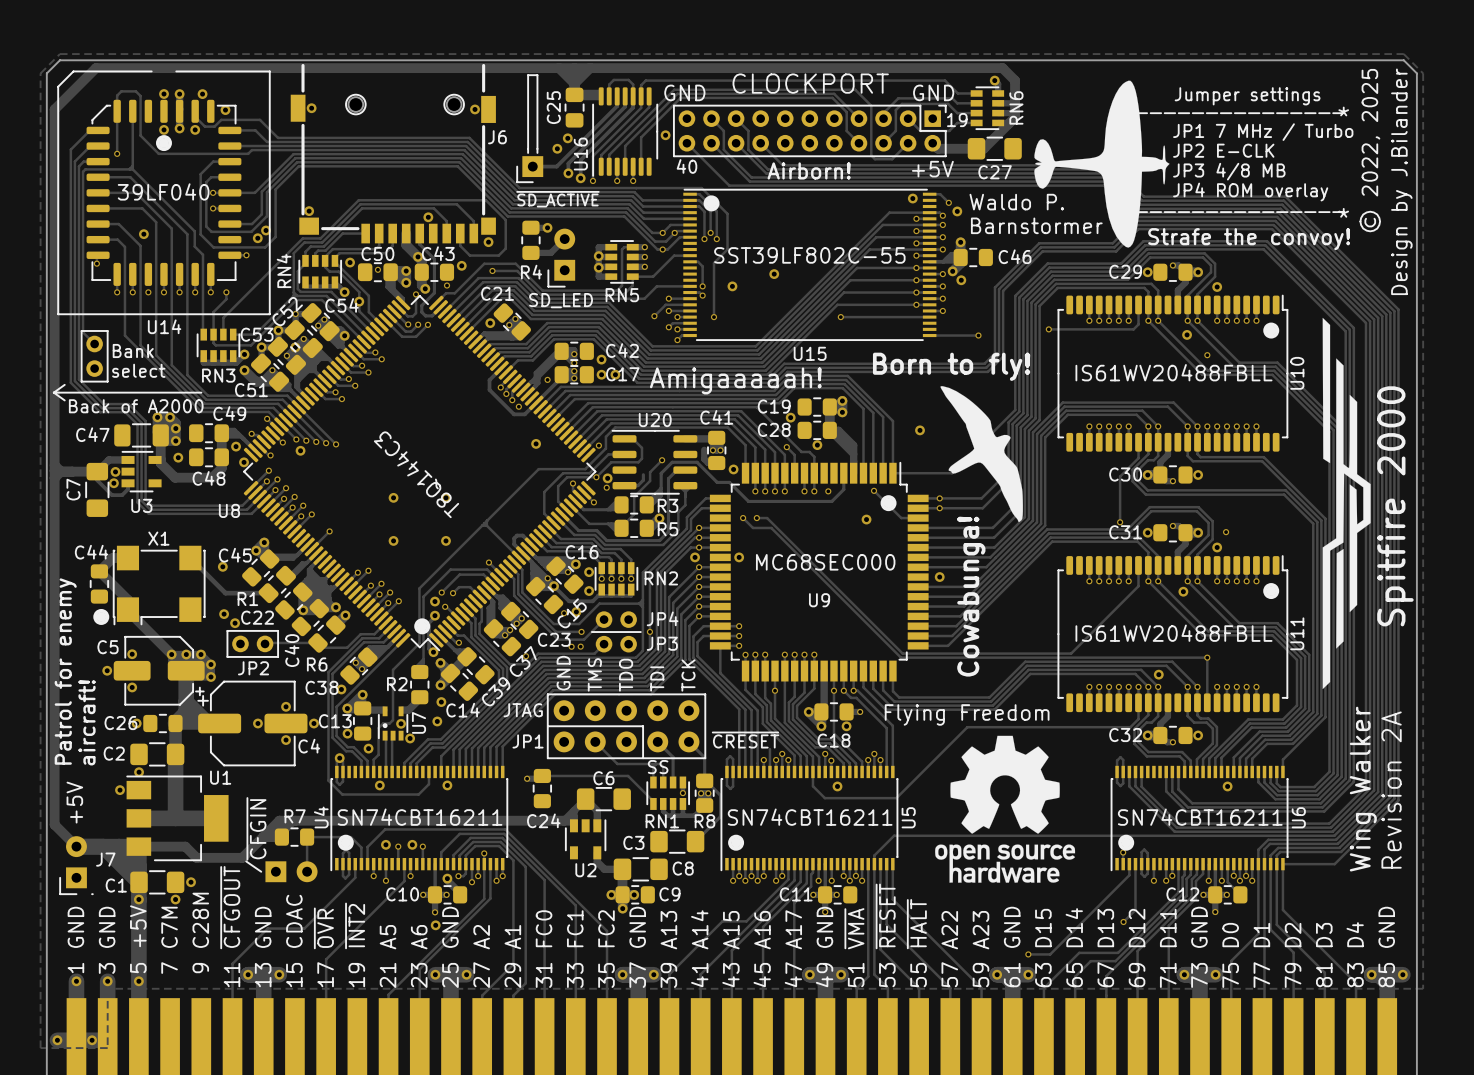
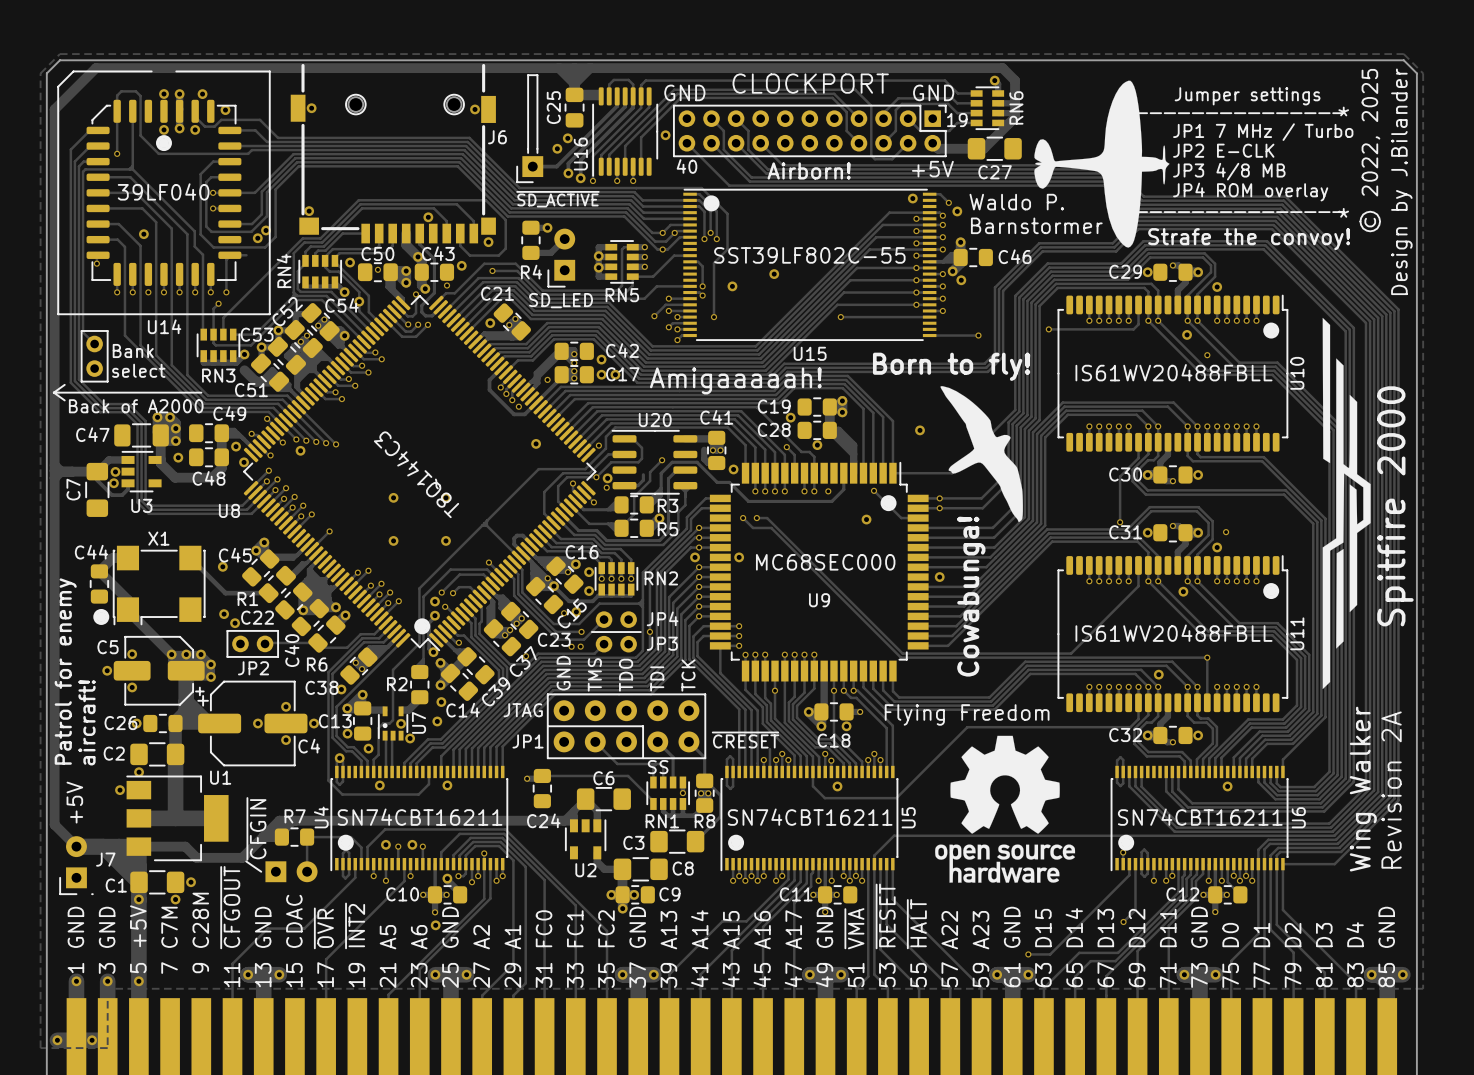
via: (246, 255) -> none
track: none -> (226, 259) (231, 255) (226, 256) (226, 292)
track: (226, 292) (226, 299) (213, 312) -> (218, 303) (213, 308) (213, 312)
via: none -> (218, 303)
via: (295, 314) -> none
via: none -> (307, 335)
via: (303, 338) -> none
via: none -> (300, 341)
via: (295, 347) -> none
via: (286, 355) -> none
via: (244, 370) -> none
via: (272, 370) -> none

